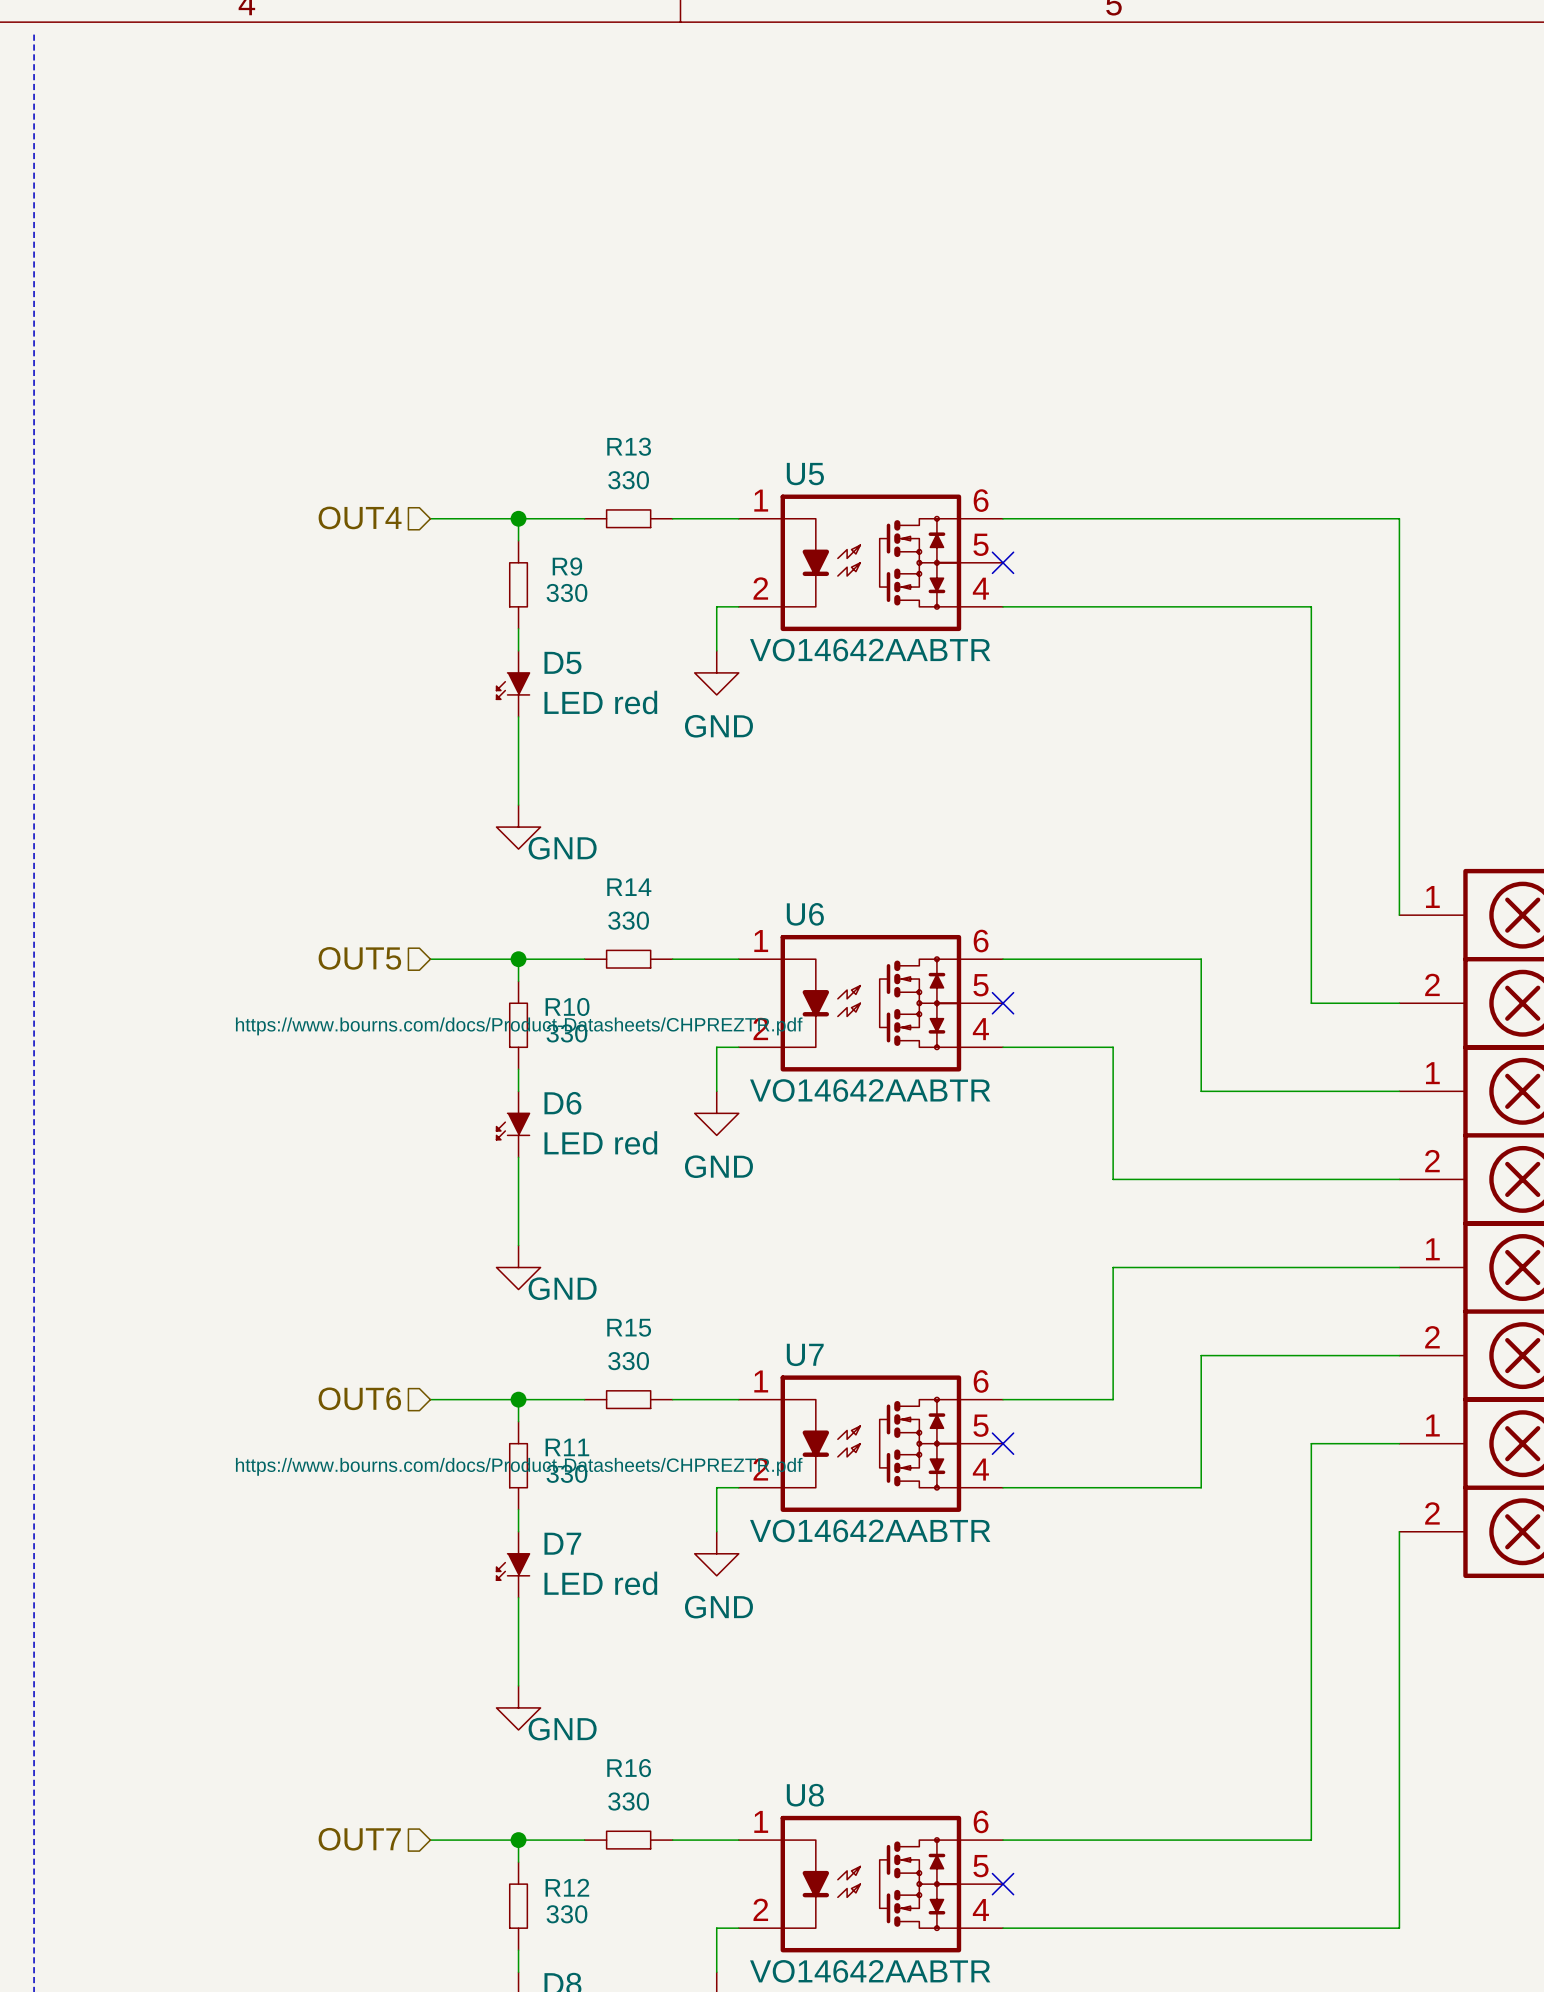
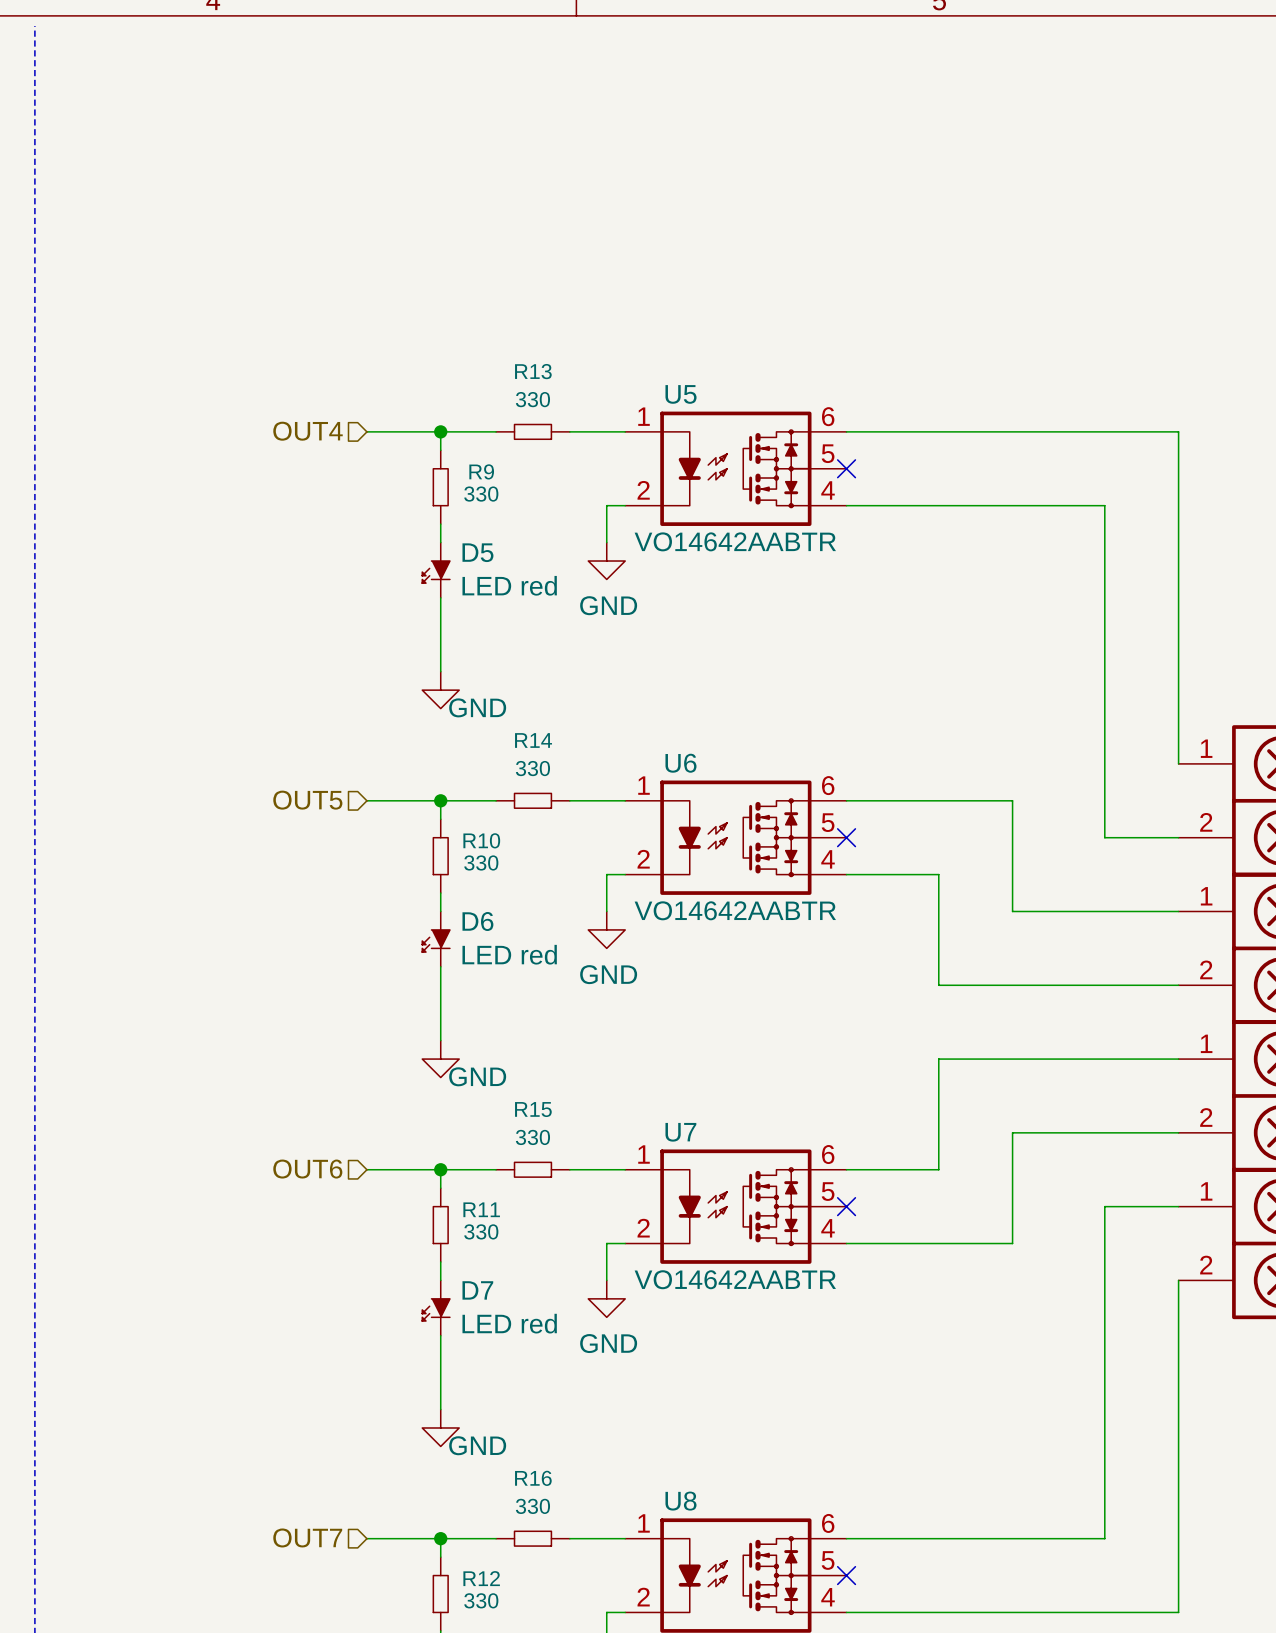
R10 text: https://www.bourns.com/docs/Product-Datasheets/CHPREZTR.pdf (519, 1026) -> none
R11 text: https://www.bourns.com/docs/Product-Datasheets/CHPREZTR.pdf (519, 1466) -> none

